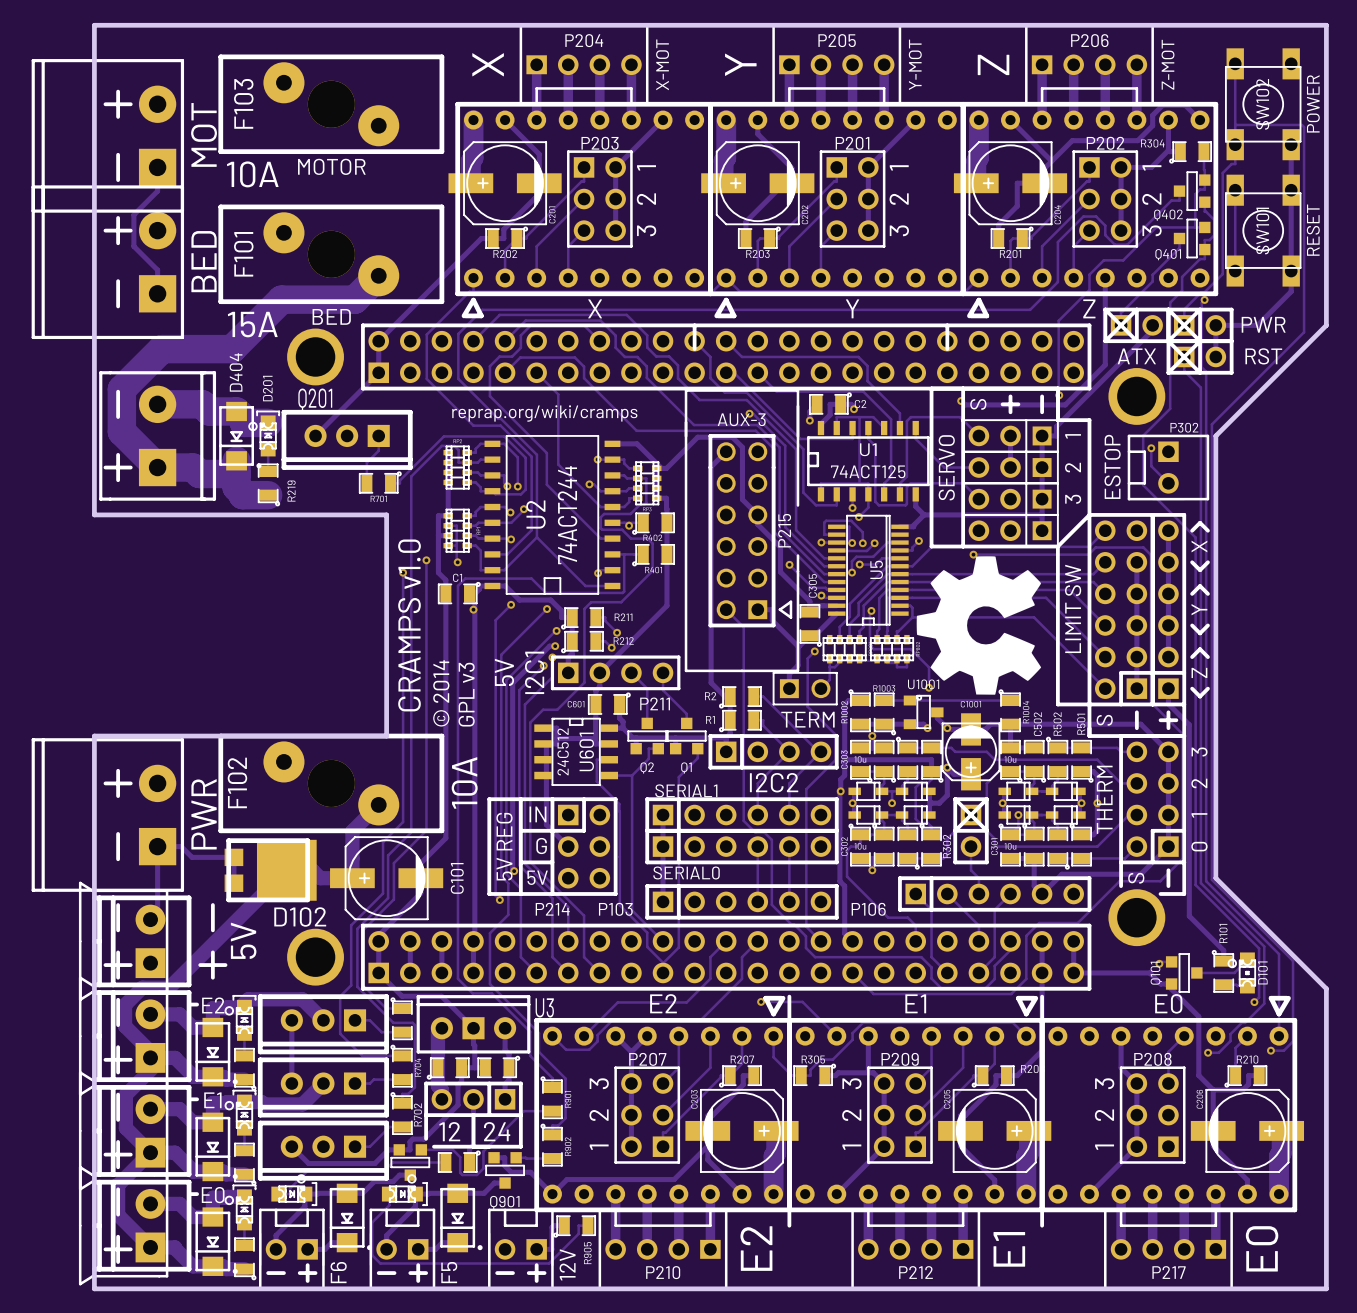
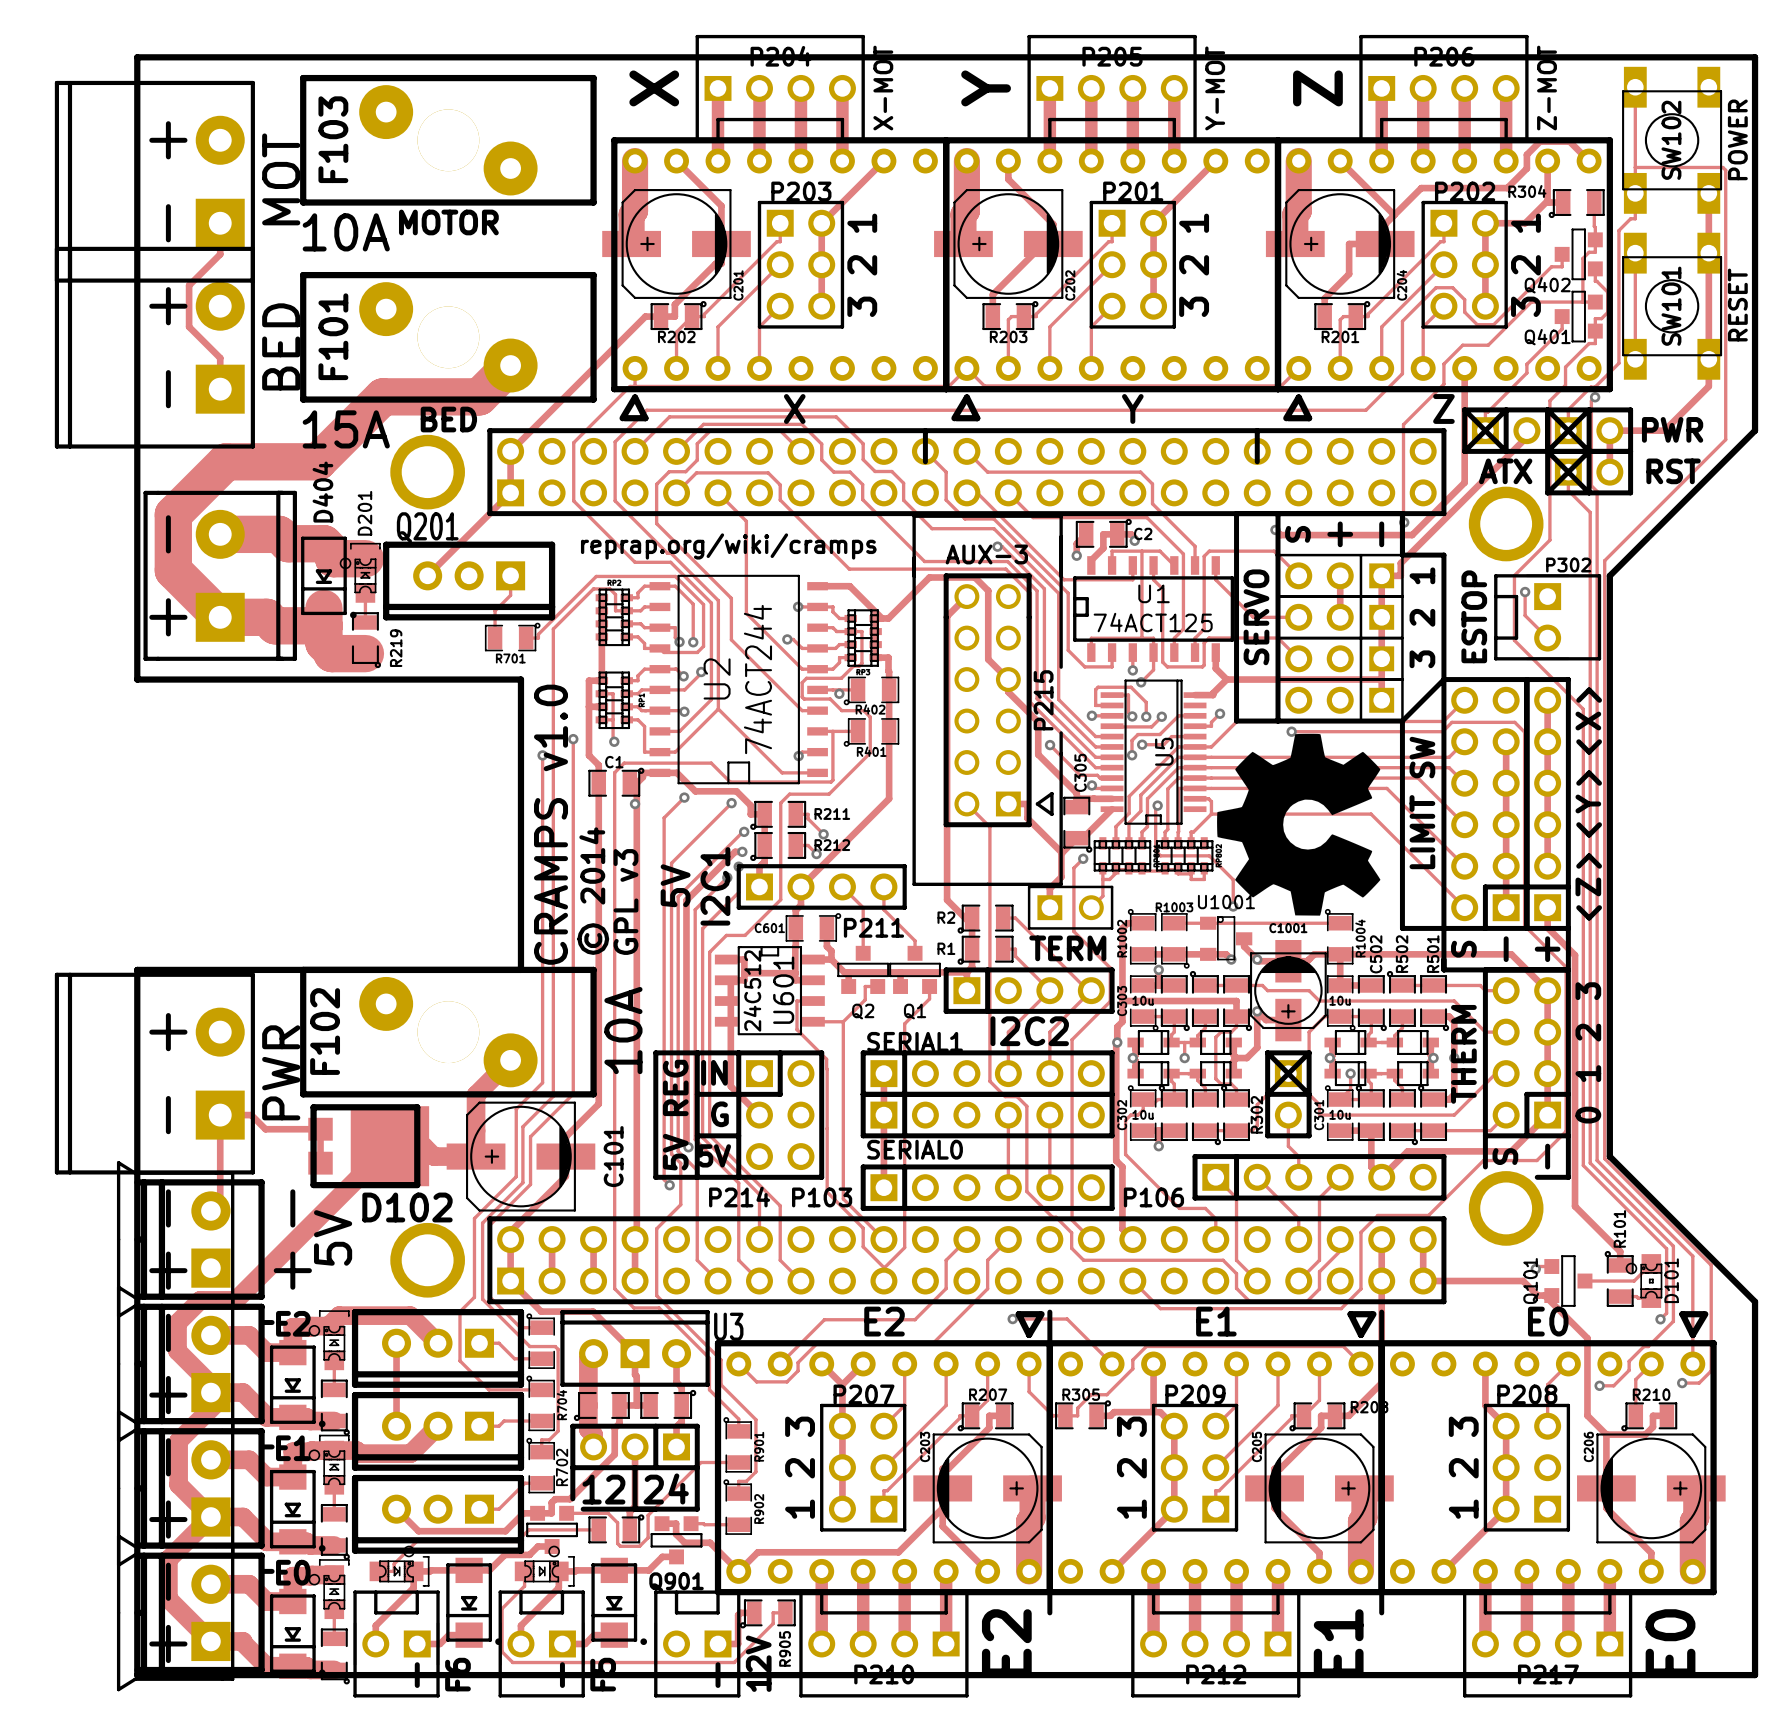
board edge: (94, 41) (94, 25) (1326, 25) (1326, 41) -> (137, 57) (1755, 57)
board edge: (94, 1273) (94, 1288) (1326, 1288) (1326, 1273) -> (137, 1675) (1755, 1675)

